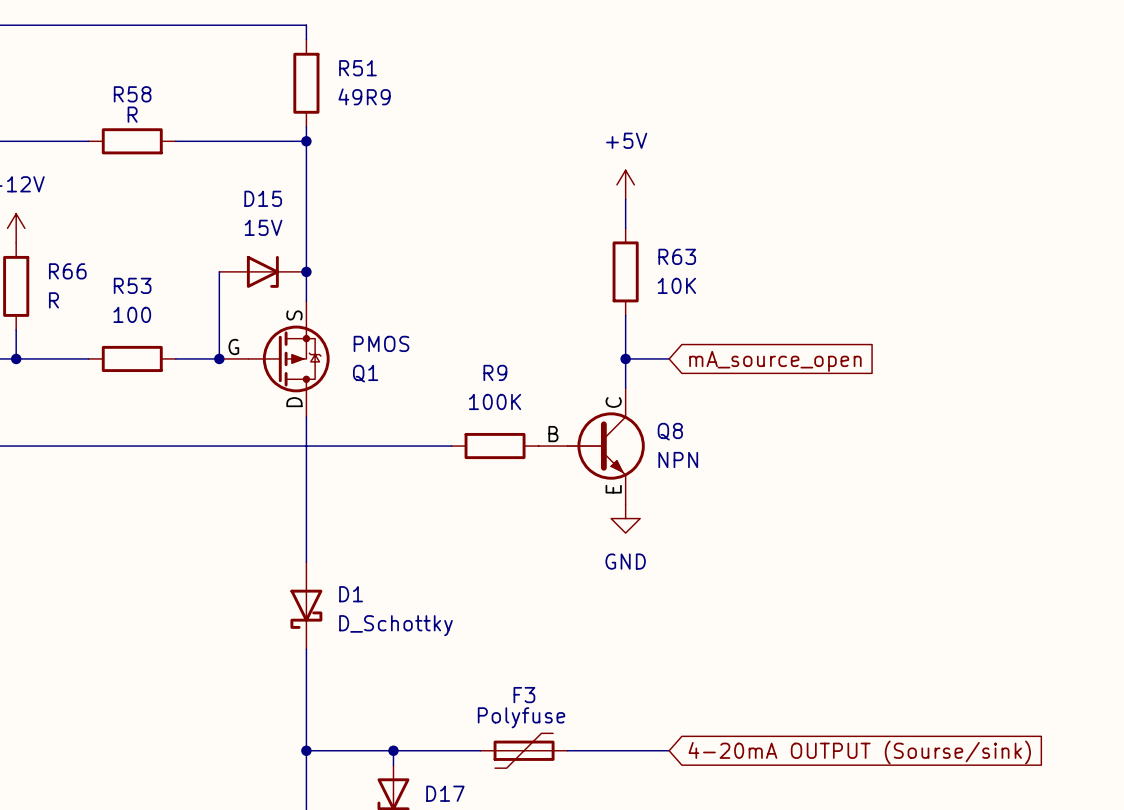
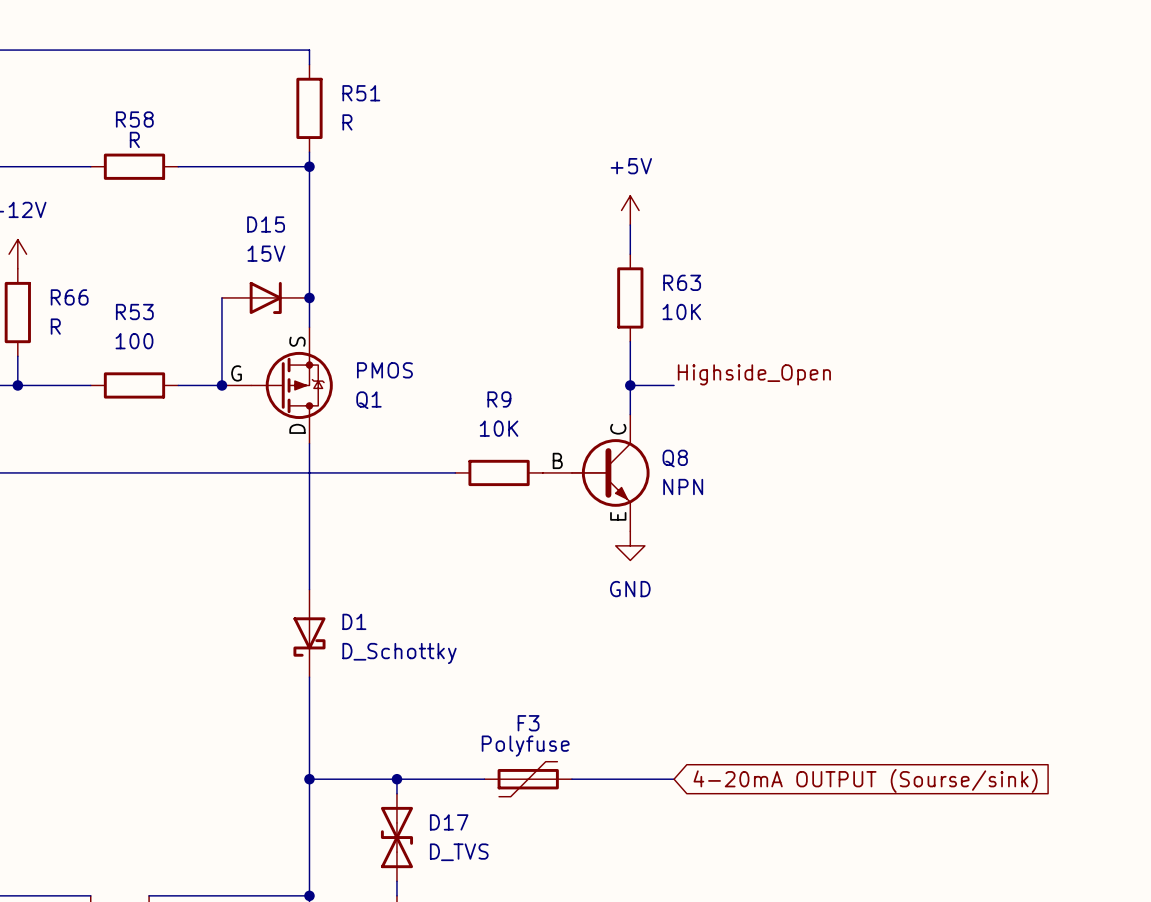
R51 value: 49R9 (364, 96) -> R (347, 122)
label: none -> Highside_Open (754, 374)
global label: mA_source_open (775, 361) -> none
R9 value: 100K (495, 401) -> 10K (499, 428)

